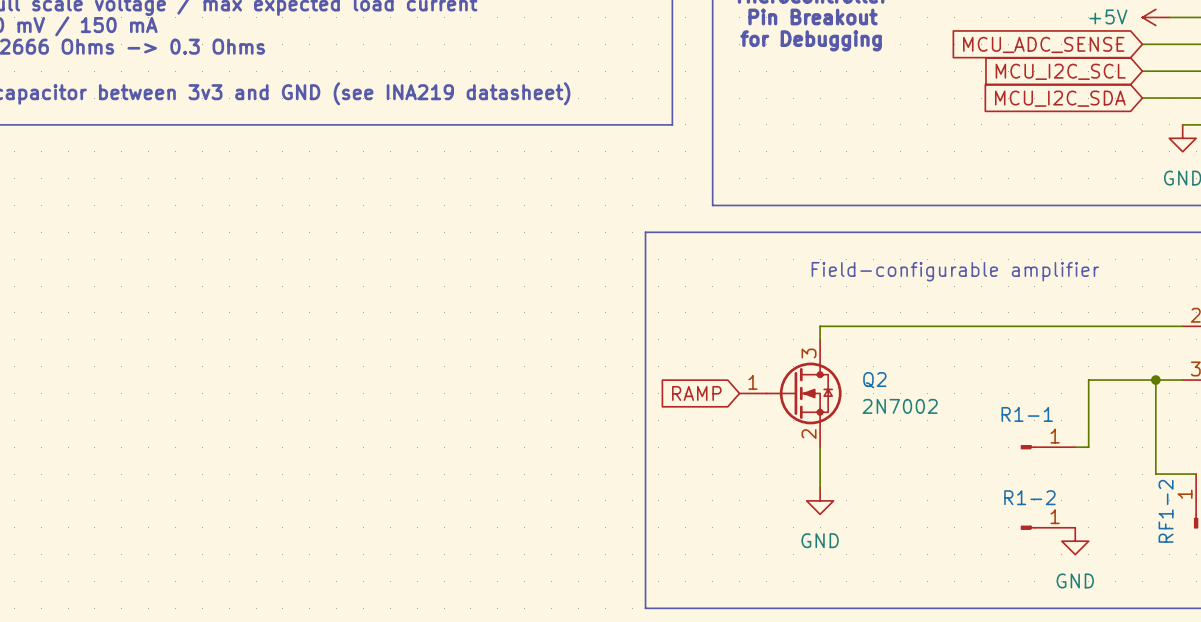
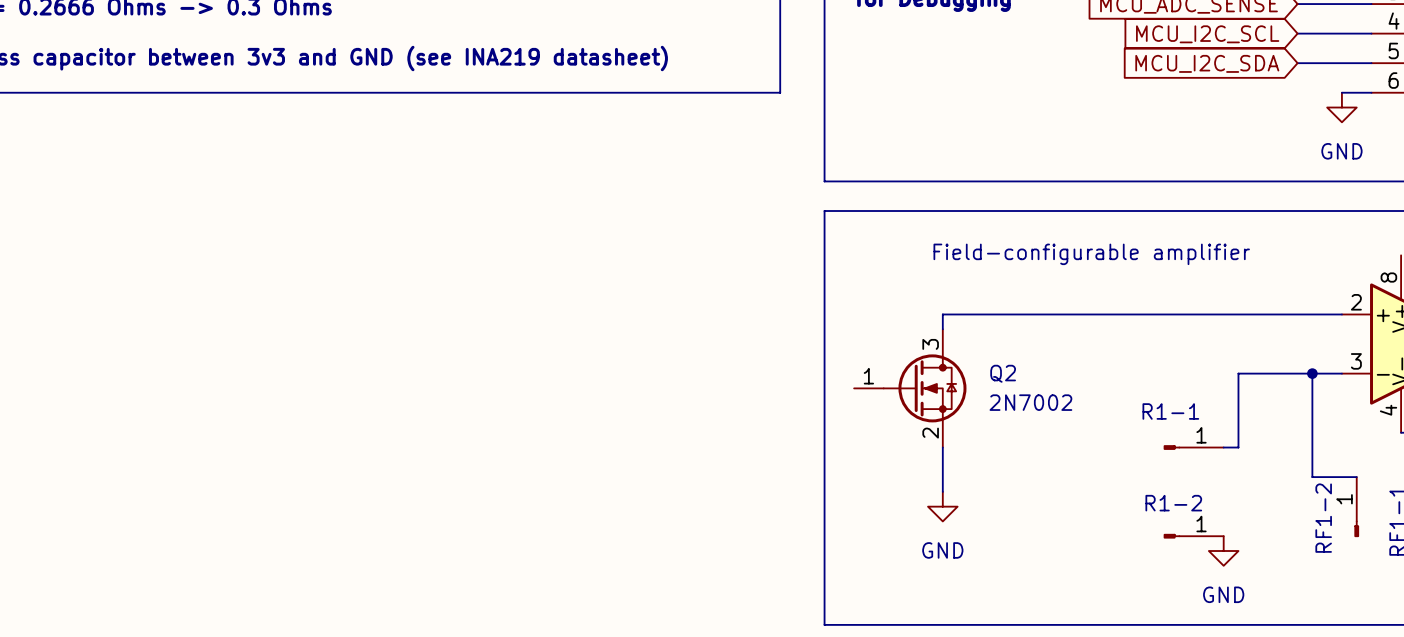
line: (712, 232) (645, 232) (645, 608) (712, 608) -> (824, 211) (824, 624)
global label: RAMP (696, 393) -> none

